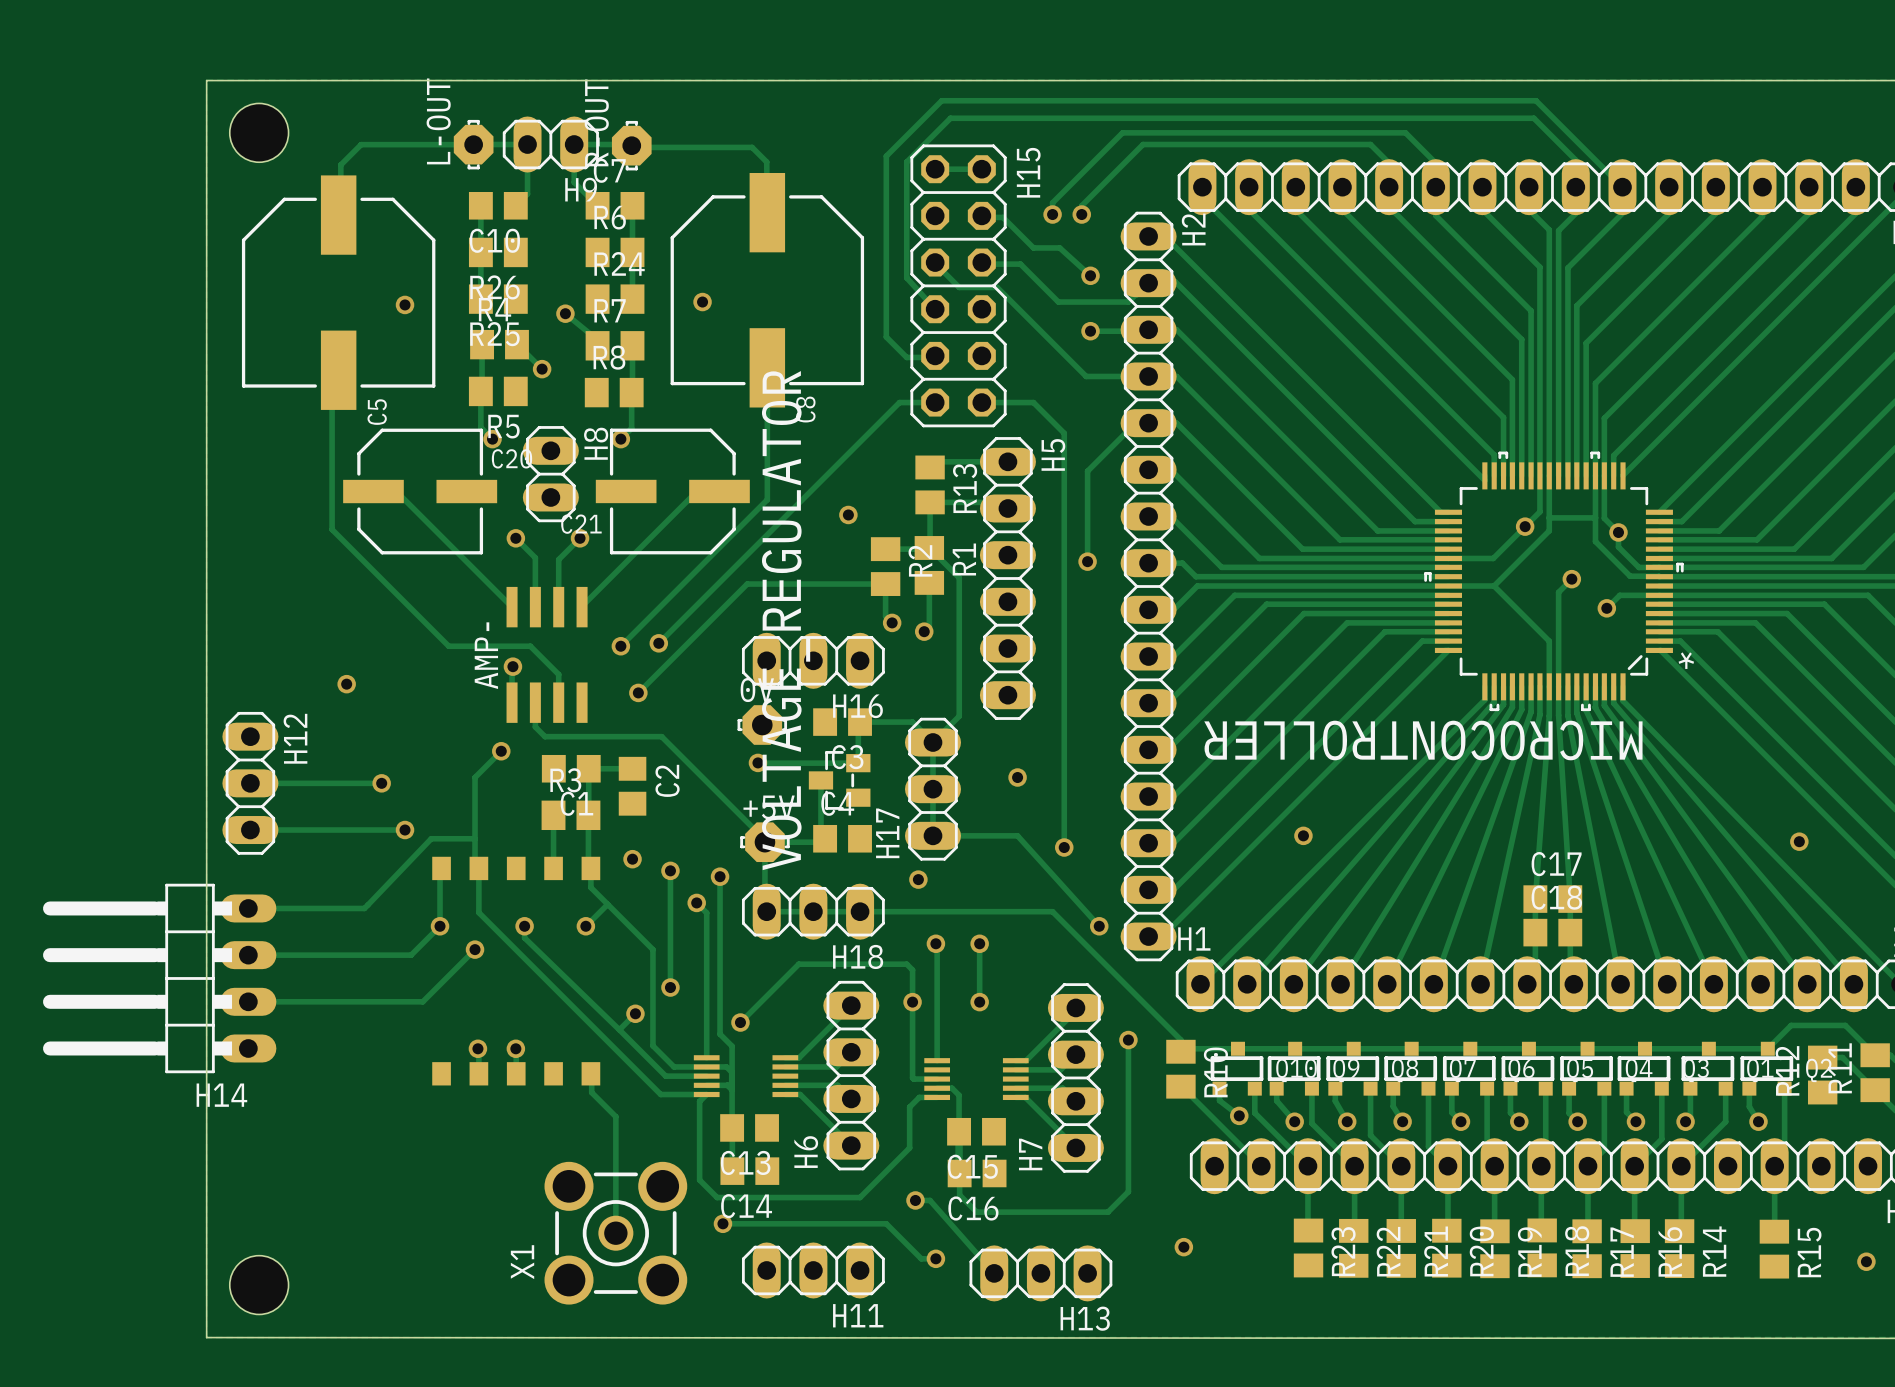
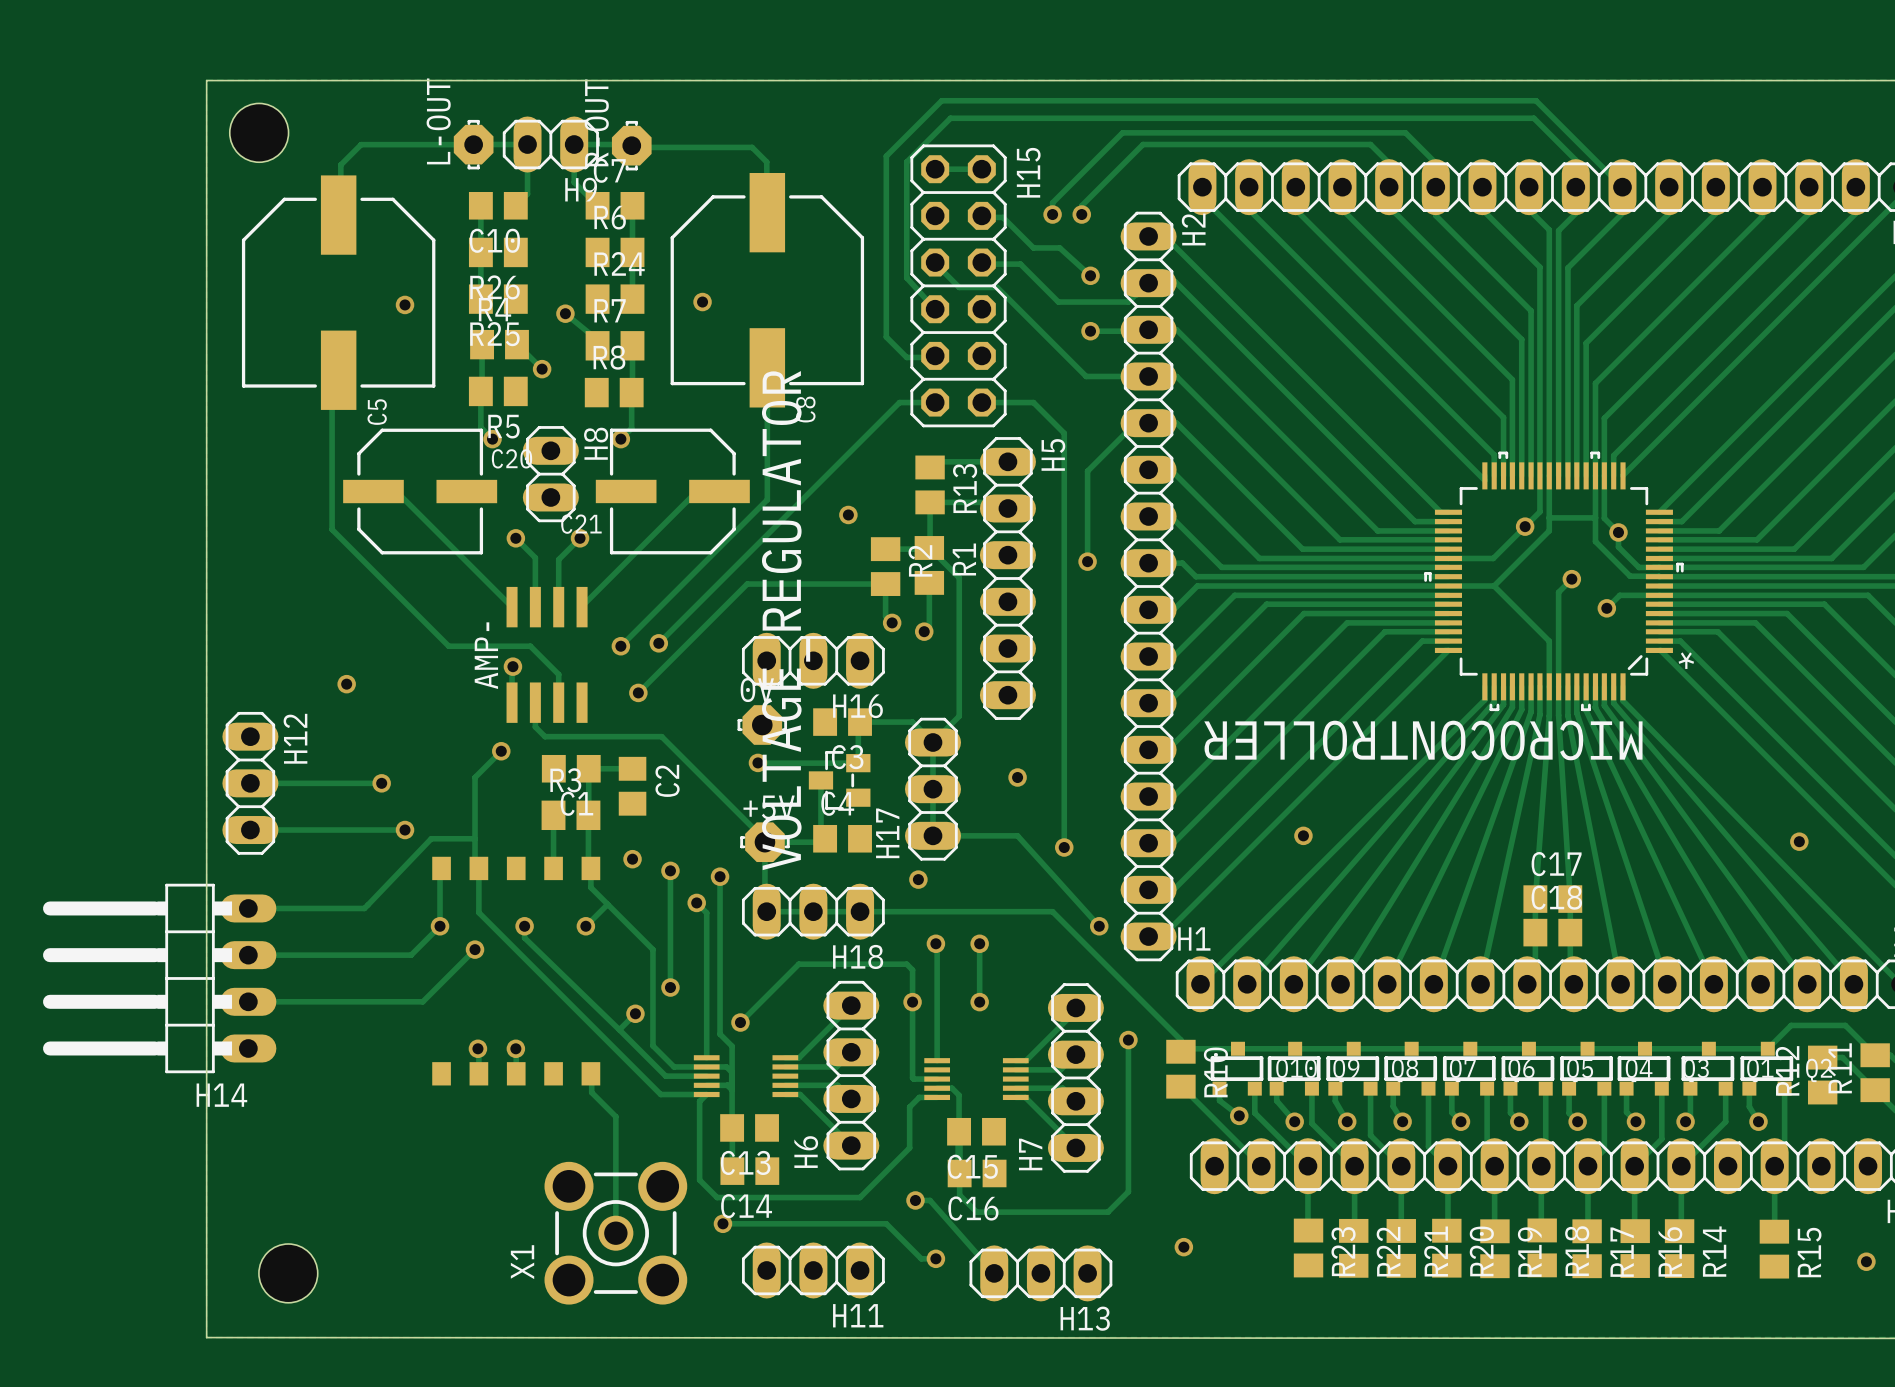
hole position: (259, 1285) -> (288, 1273)

